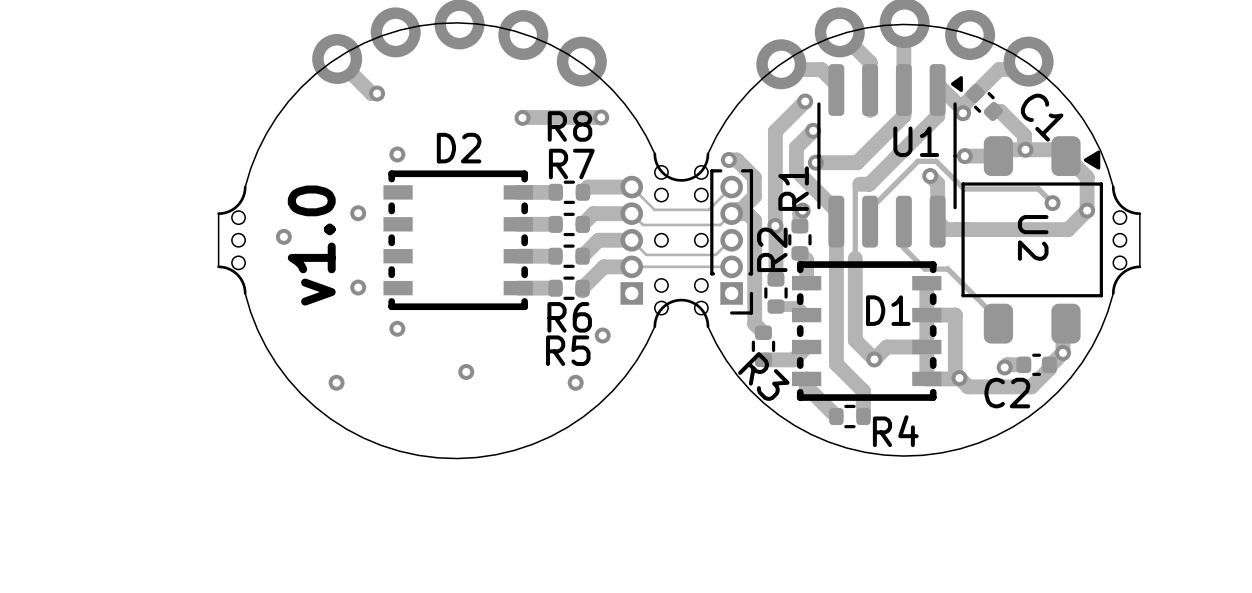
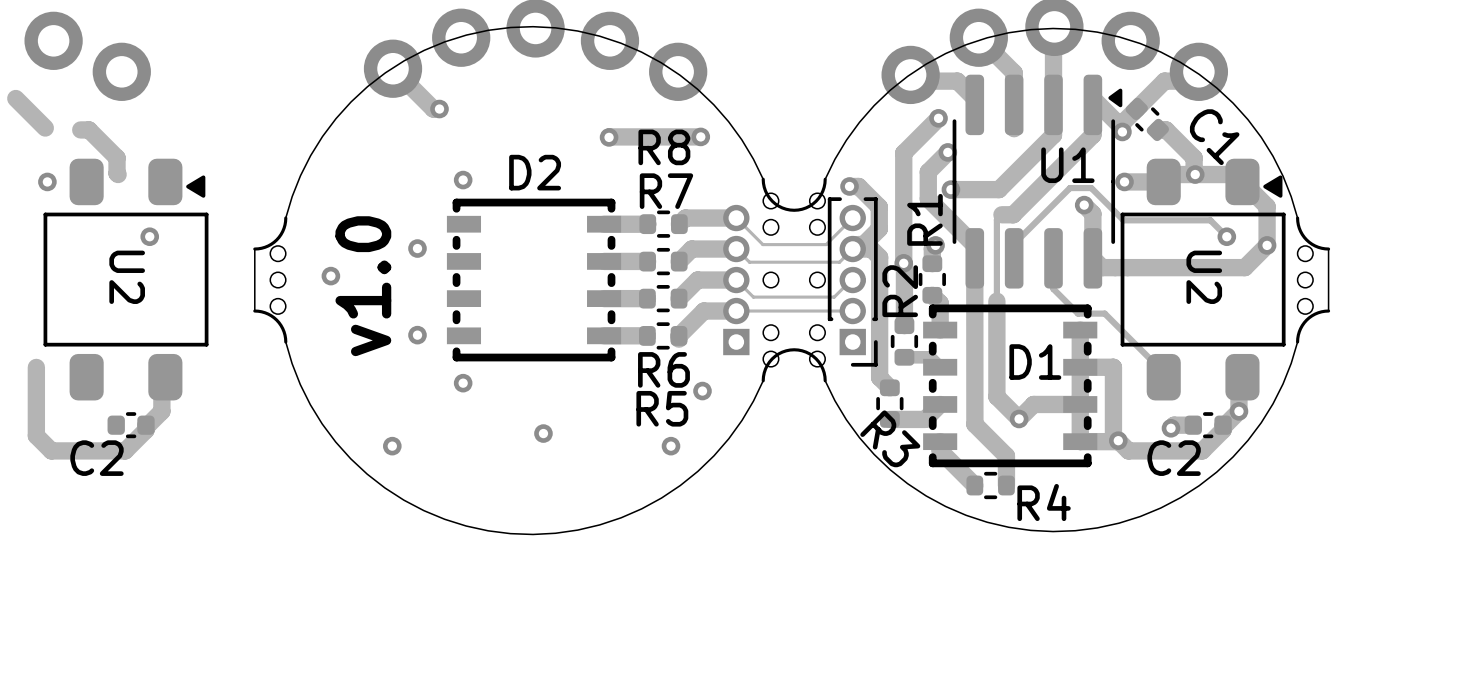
part: none -> (53, 40)
part: none -> (121, 71)
track: none -> (15, 98) (45, 128)
track: none -> (80, 129) (89, 129) (117, 157) (118, 174)
via: none -> (47, 181)
via: none -> (149, 236)
U2: none -> (126, 279)
track: none -> (36, 367) (36, 435) (51, 450) (125, 450) (145, 430) (145, 425) (161, 411) (161, 380) (165, 377)
C2: none -> (131, 425)

